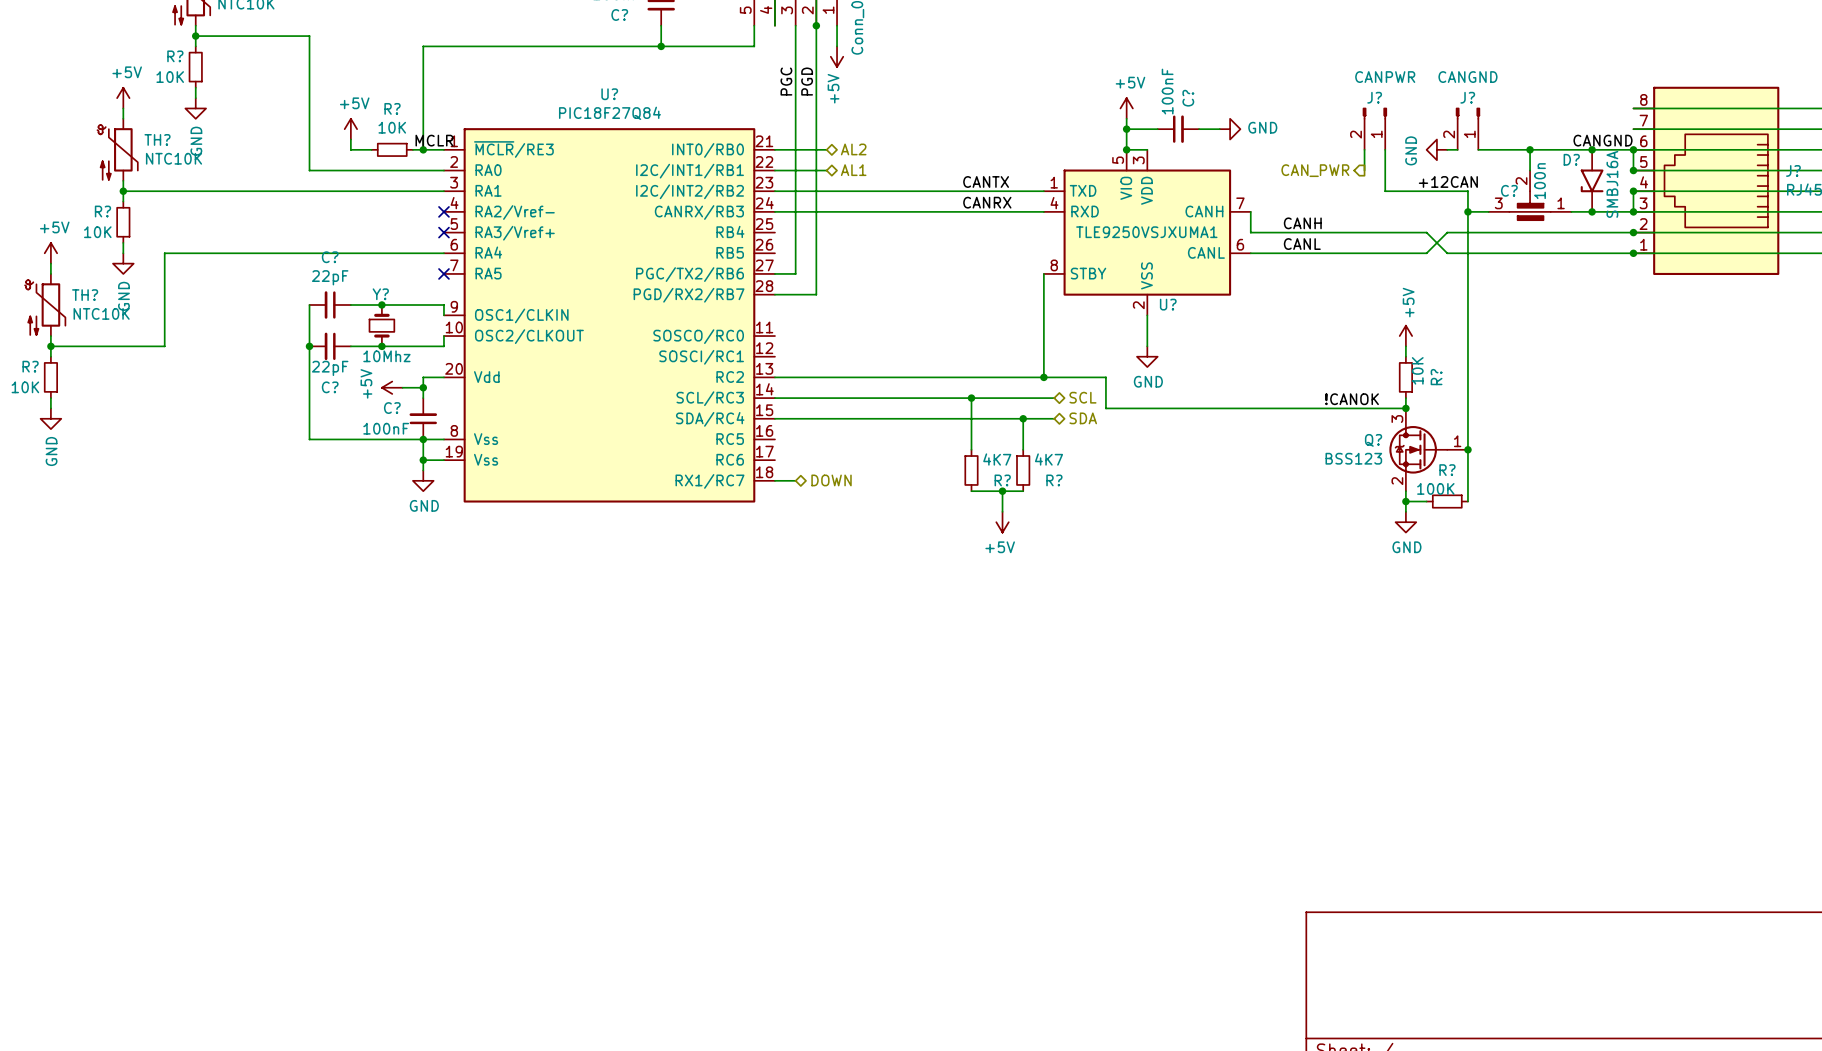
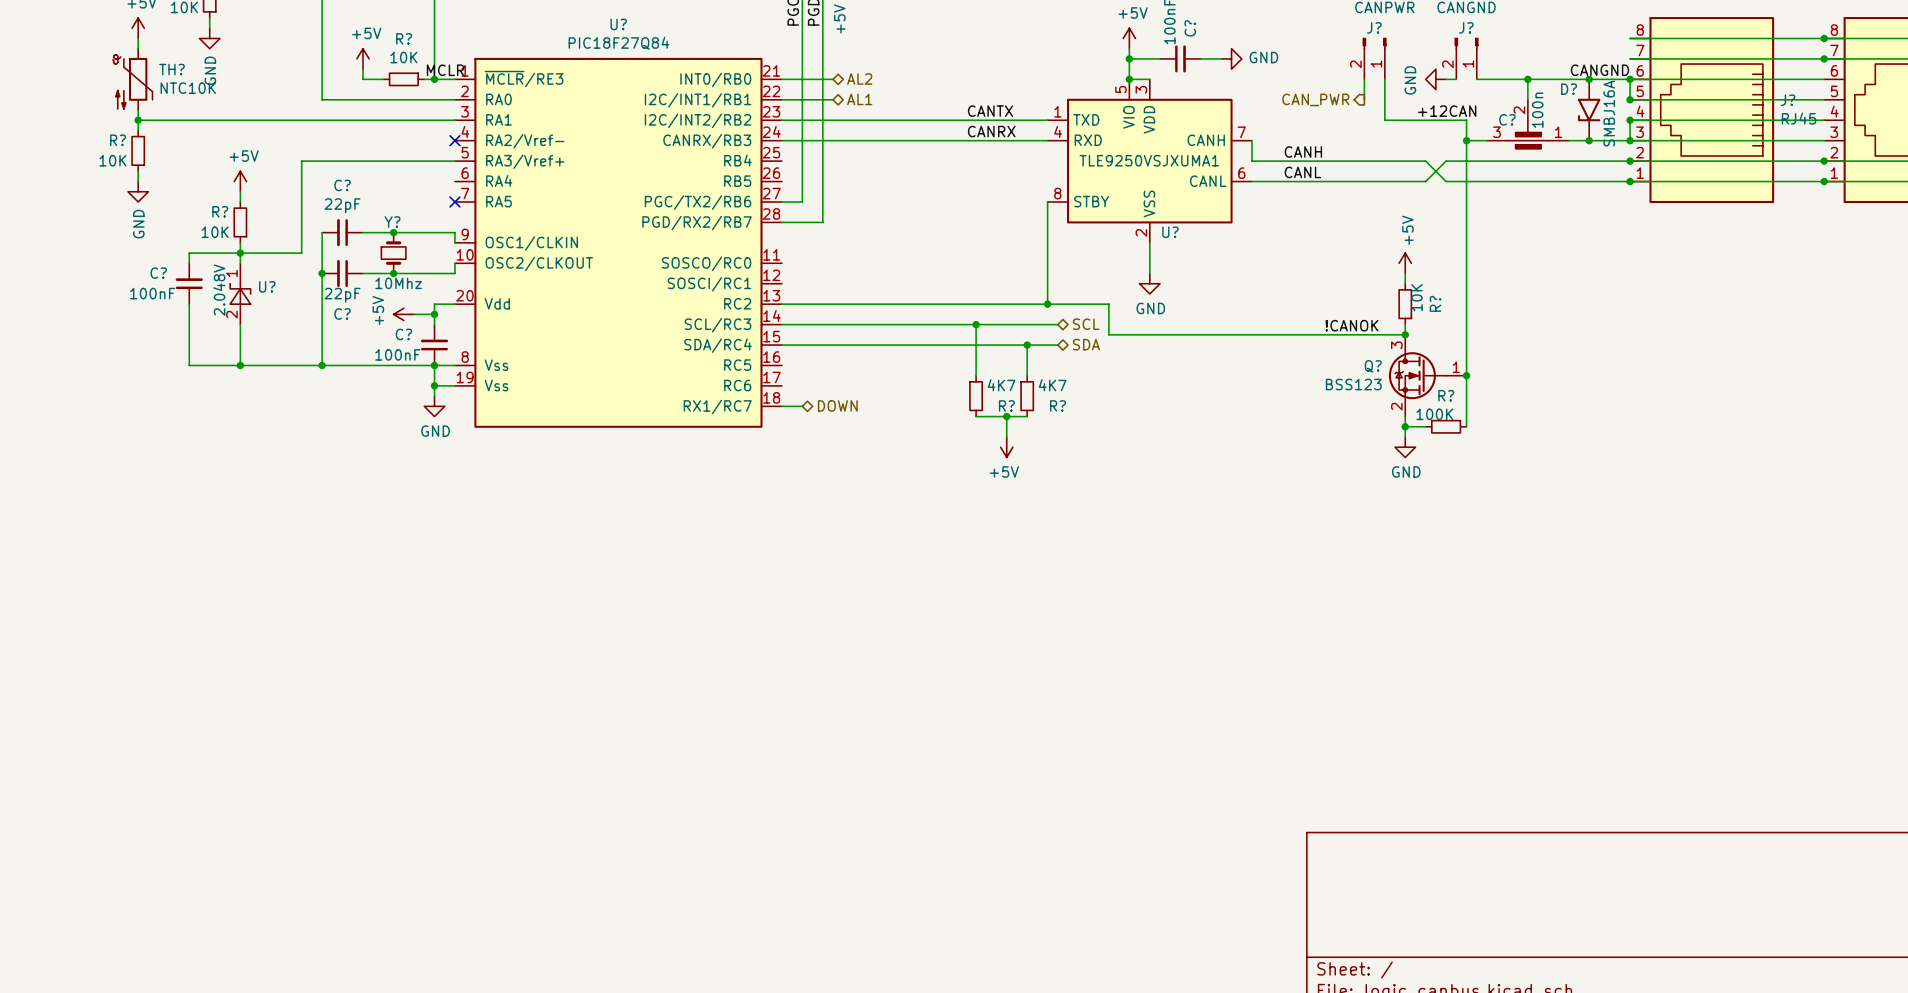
wire: none -> (454, 161) (301, 161) (301, 253) (189, 253) (189, 263)
no-connect mark: (443, 232) -> none
power symbol position: +5V (50, 253) -> +5V (240, 181)
wire: (443, 253) (164, 253) (164, 346) (50, 346) -> none
wire: (50, 263) (50, 273) -> (240, 191) (240, 201)
TH?: NTC10K (45, 304) -> none
junction: none -> (240, 253)
wire: (50, 336) (50, 356) -> (240, 242) (240, 263)
junction: (50, 346) -> none
C?: none -> 100nF (189, 283)
U?: none -> 2.048V (240, 293)
R? position: (50, 377) -> (240, 222)
wire: none -> (189, 304) (189, 365) (322, 365)
wire: (50, 398) (50, 408) -> none
wire: none -> (240, 324) (240, 365)
power symbol: GND (50, 418) -> none
junction: none -> (240, 365)
junction: none -> (322, 365)

